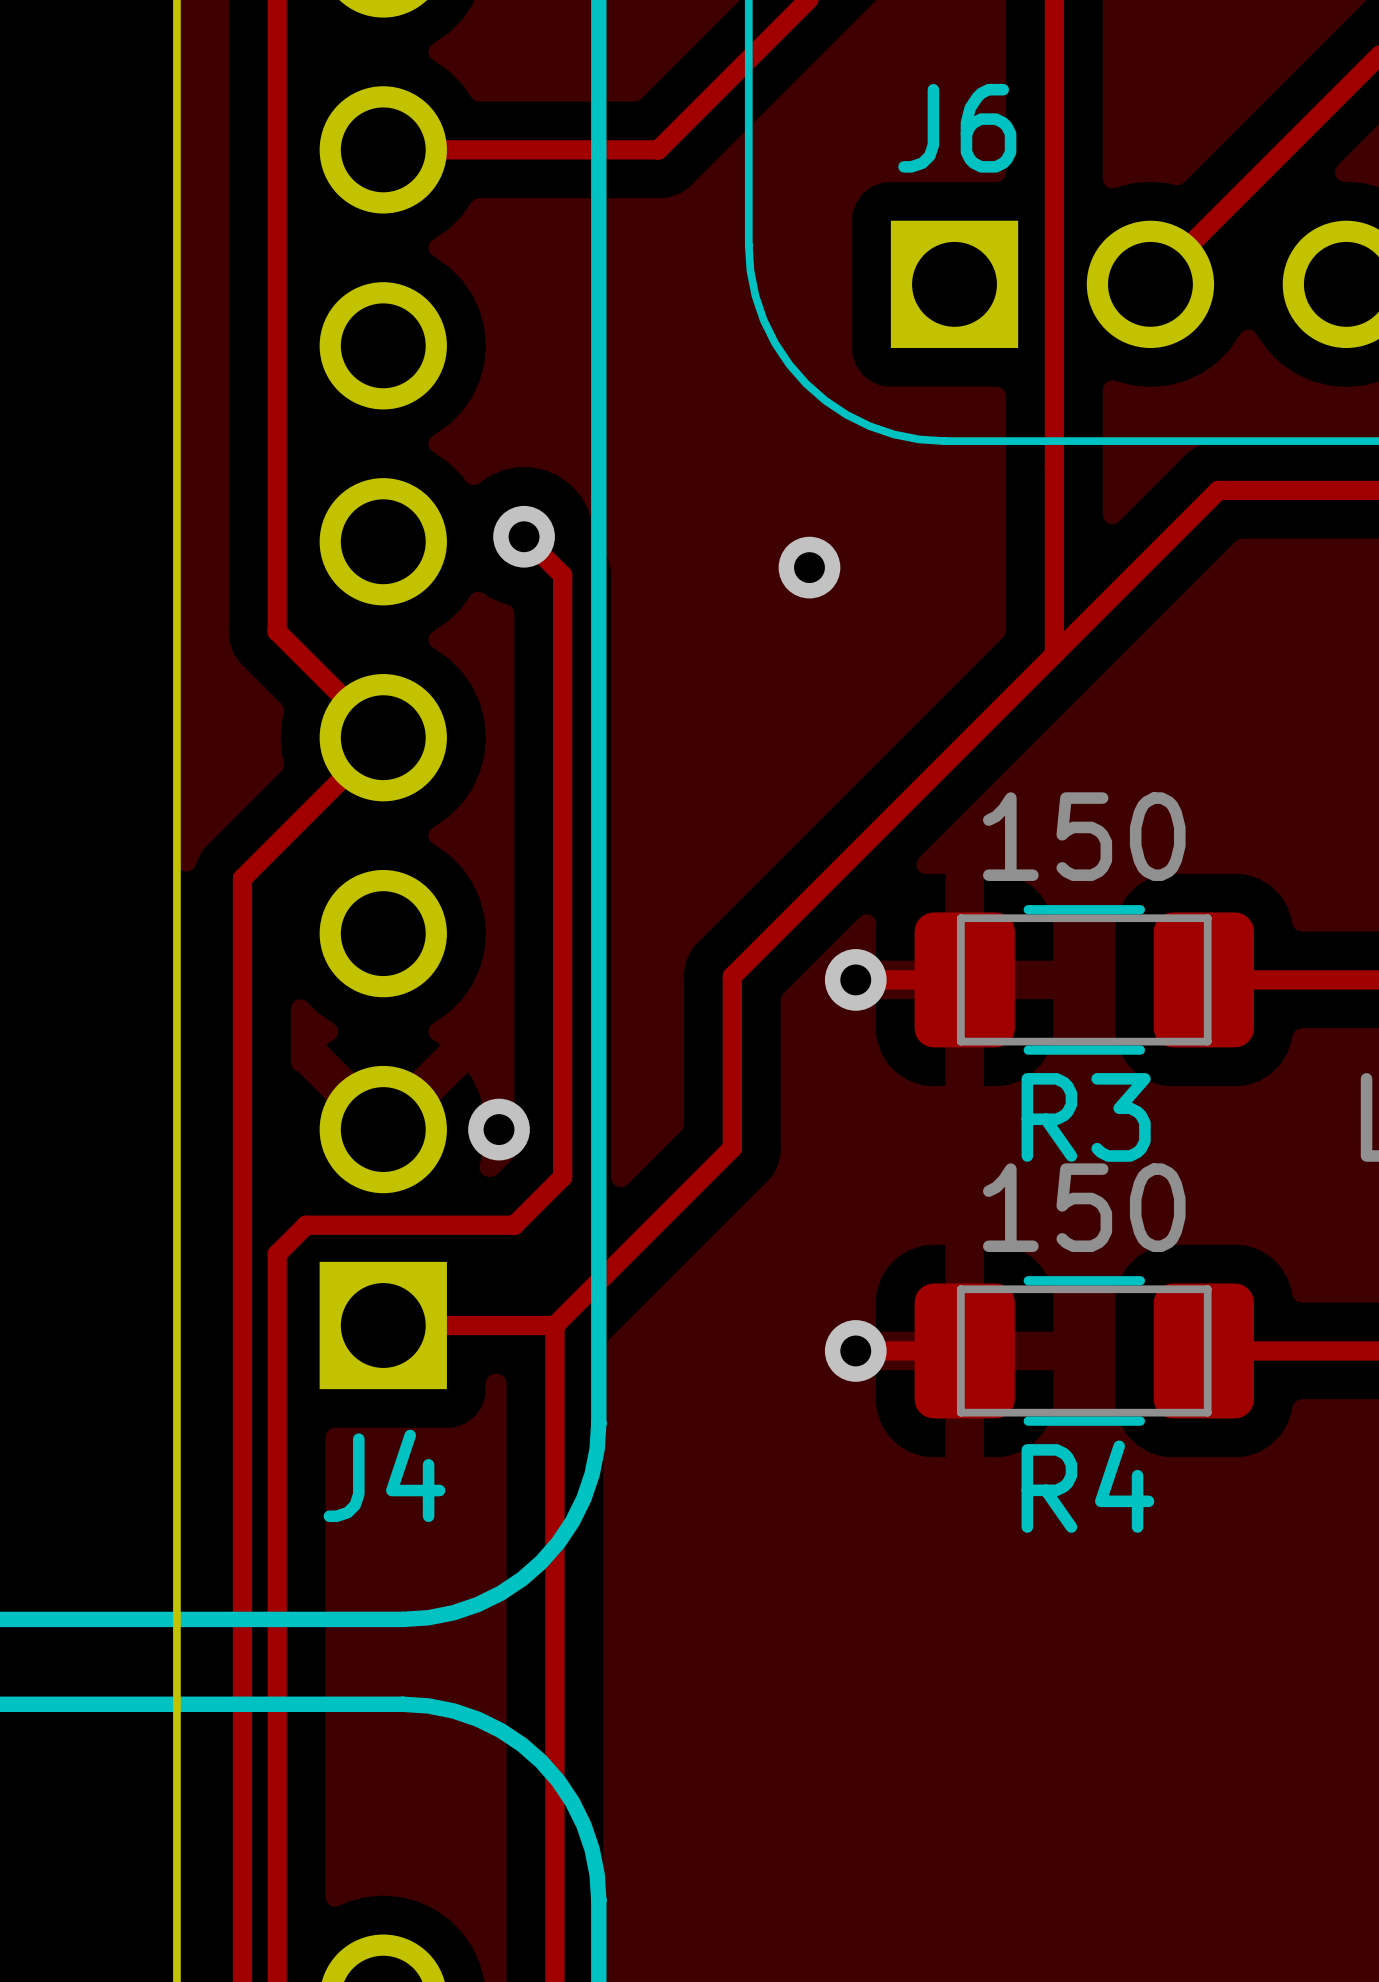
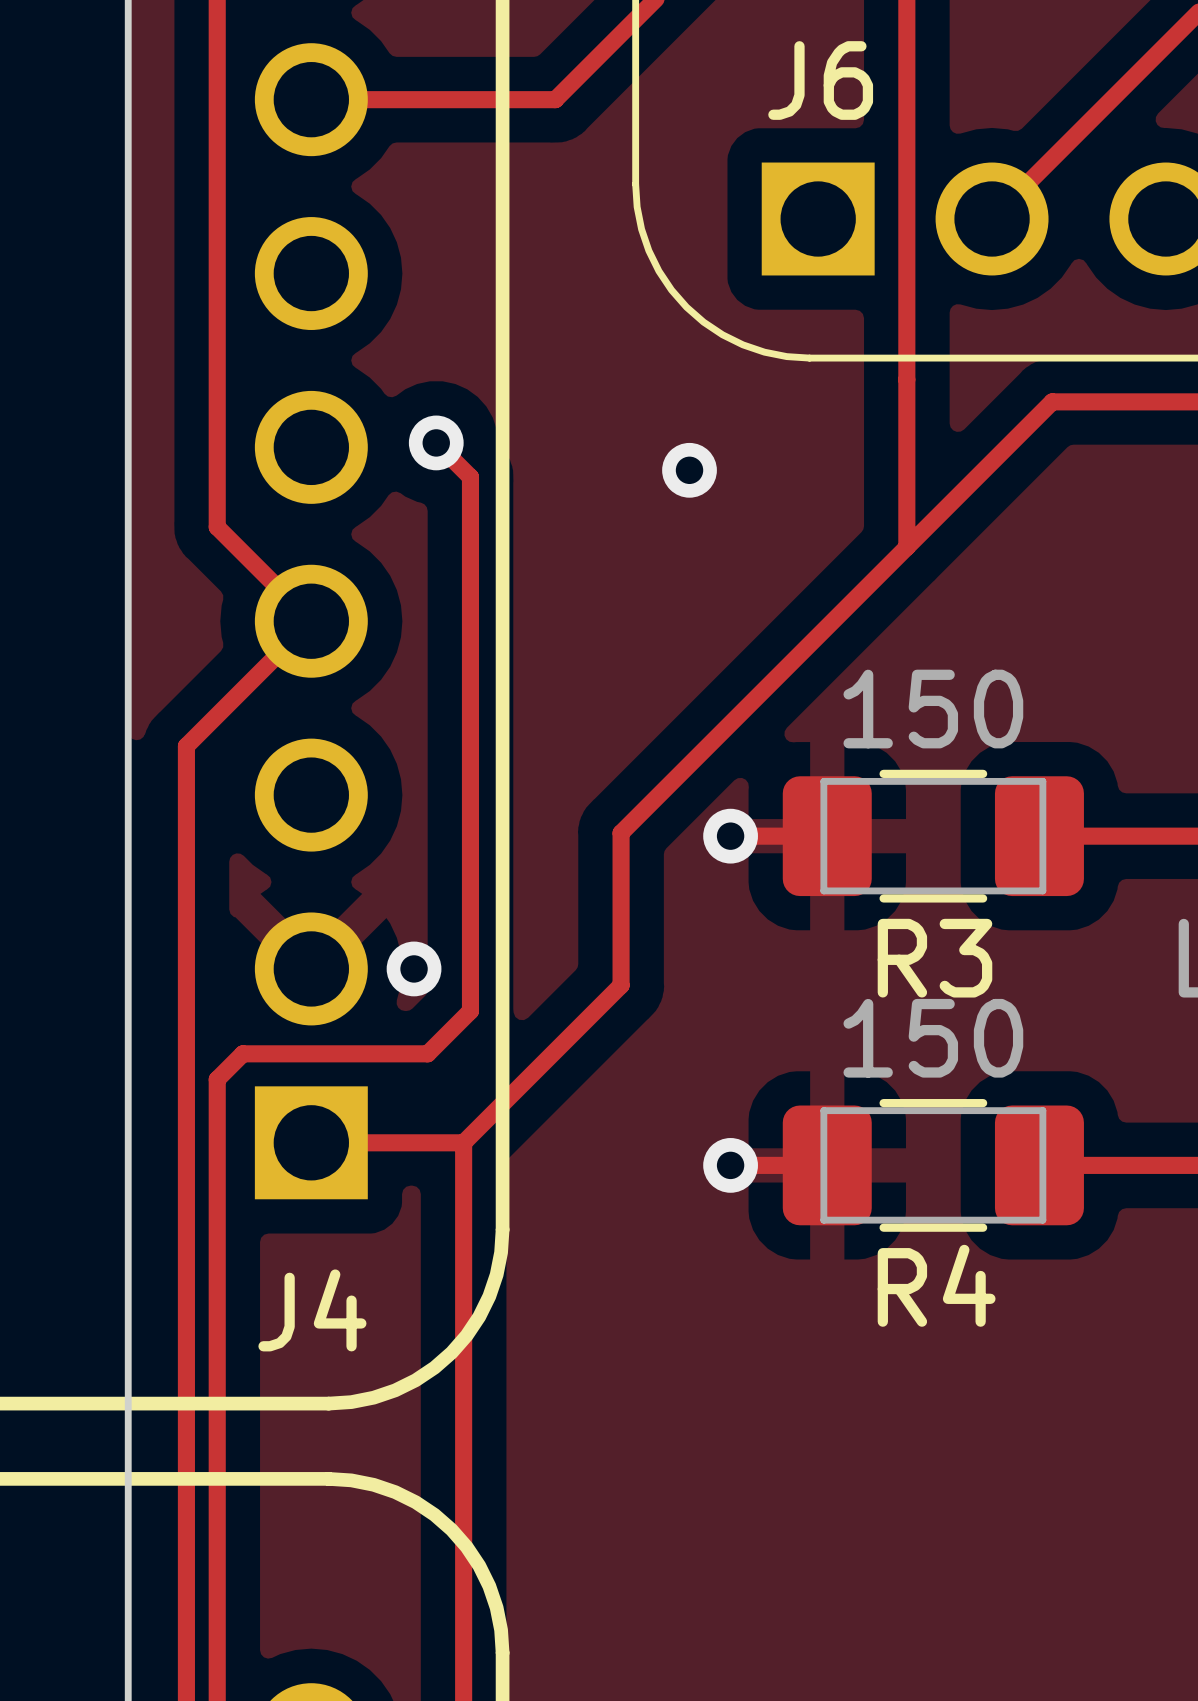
J4 name position: J4 (384, 1475) -> J4 (312, 1310)

